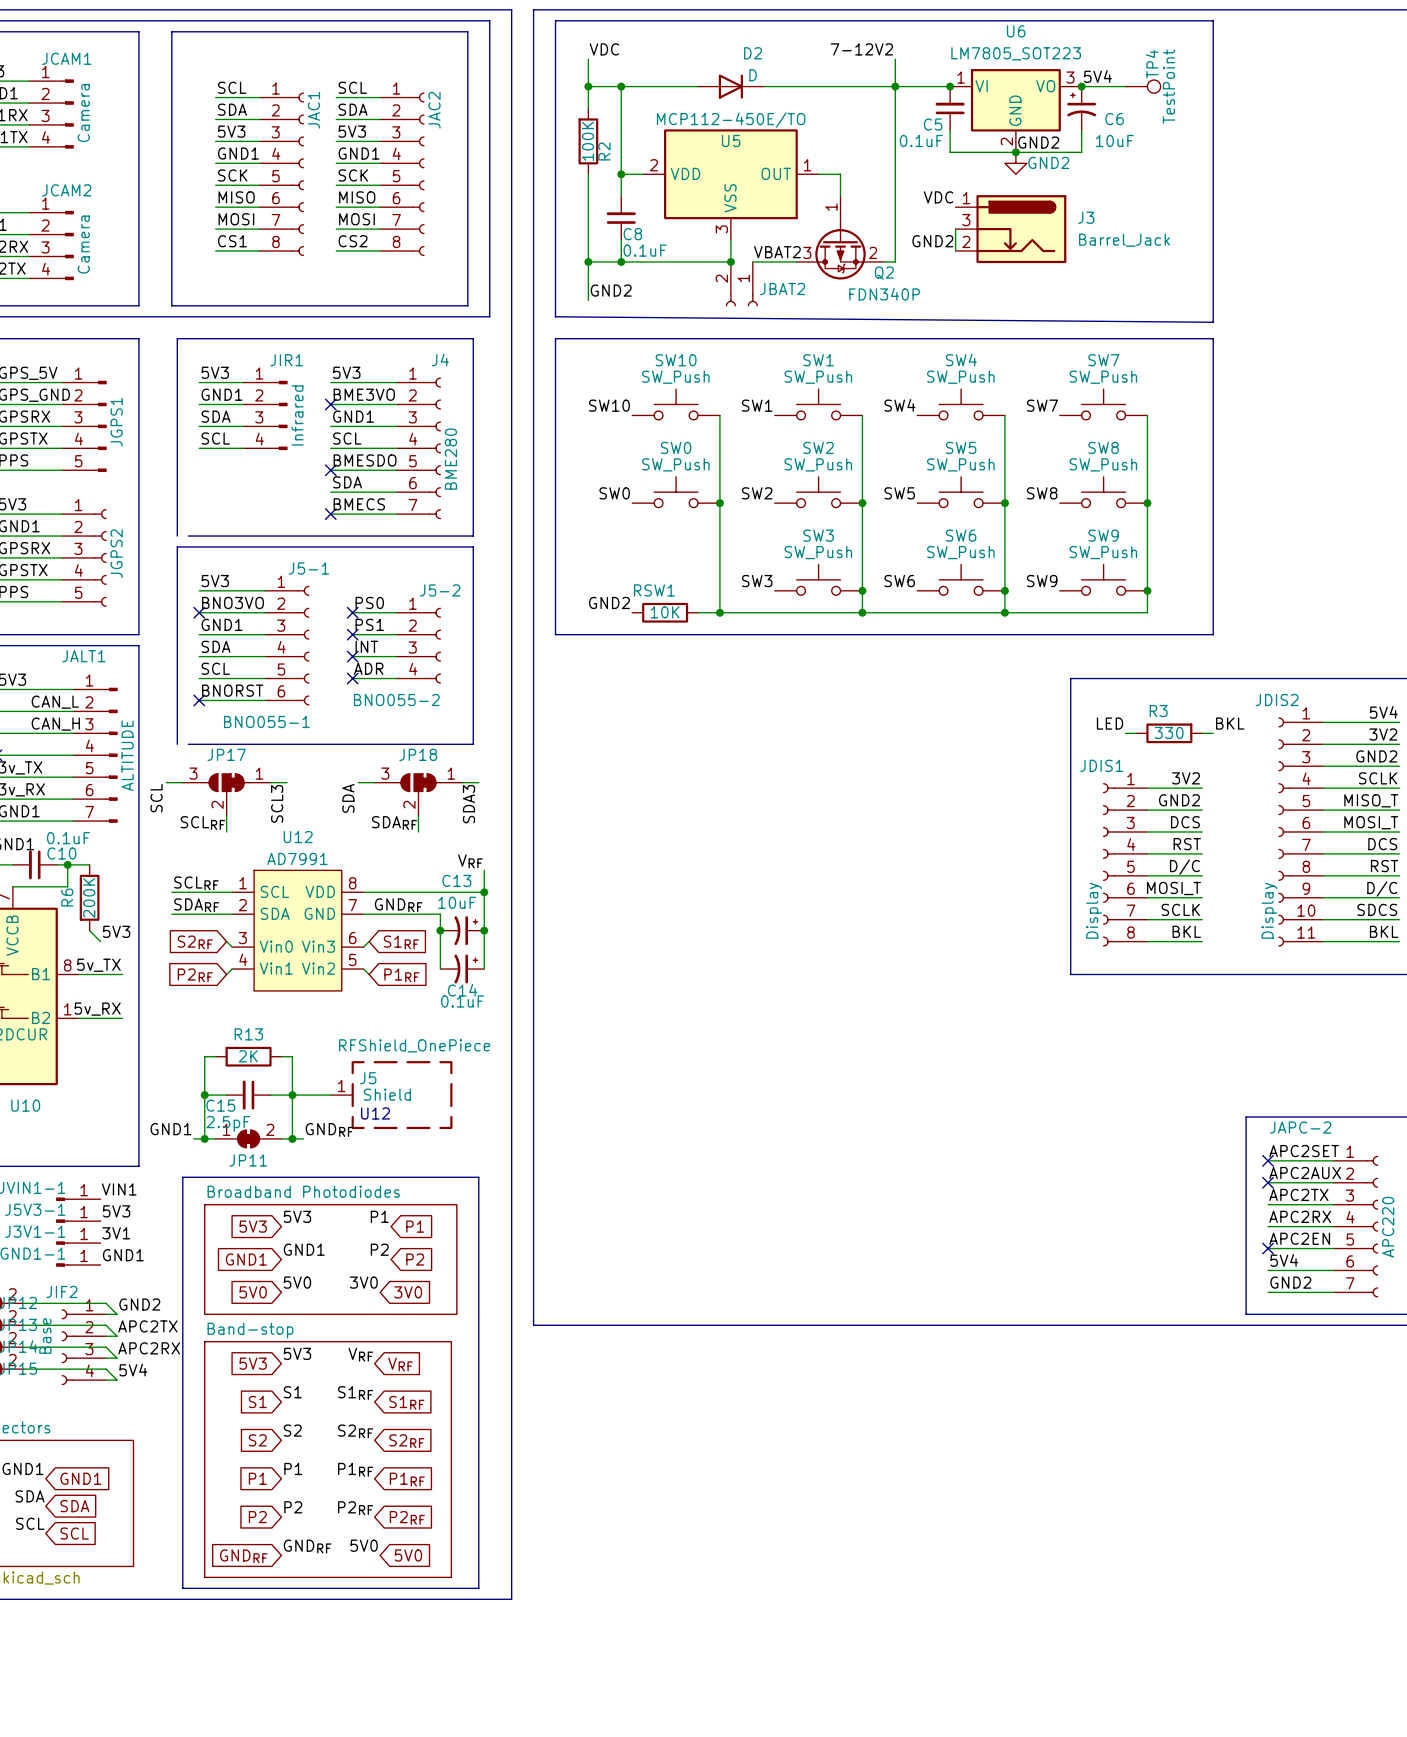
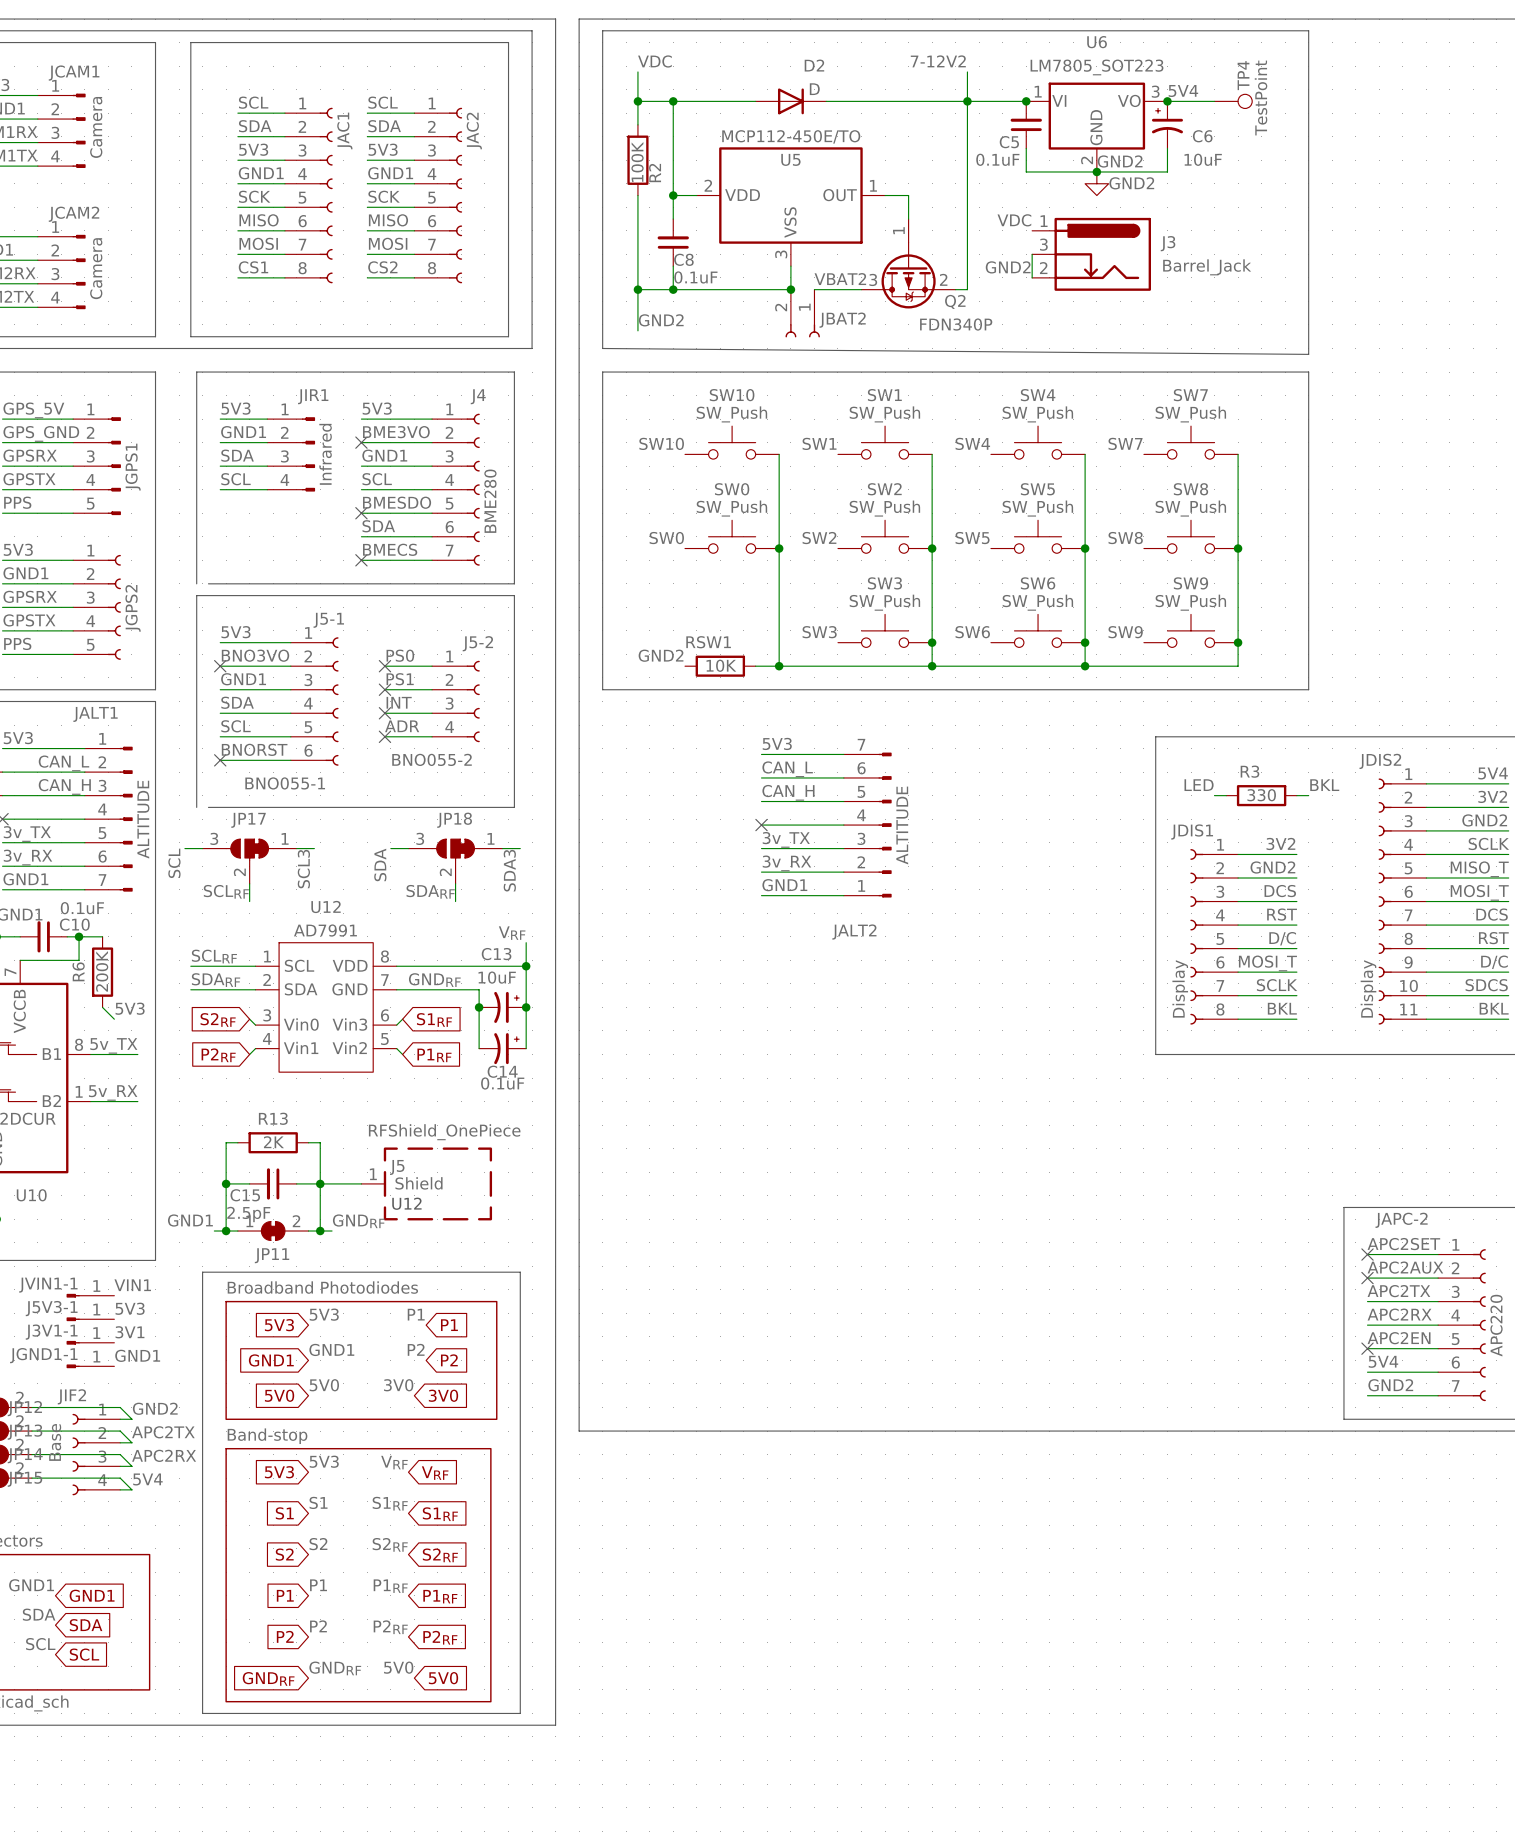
label: none -> 5V3 (777, 743)
wire: none -> (761, 754) (843, 754)
label: none -> CAN_L (787, 769)
wire: none -> (761, 777) (843, 777)
label: none -> CAN_H (788, 792)
wire: none -> (761, 801) (843, 801)
wire: none -> (761, 825) (843, 825)
no-connect mark: none -> (761, 825)
JALT2: none -> ALTITUDE (867, 825)
label: none -> 3v_TX (786, 839)
wire: none -> (761, 848) (843, 848)
label: none -> 3v_RX (786, 863)
wire: none -> (761, 872) (843, 872)
label: none -> GND1 (784, 885)
wire: none -> (761, 895) (843, 895)

